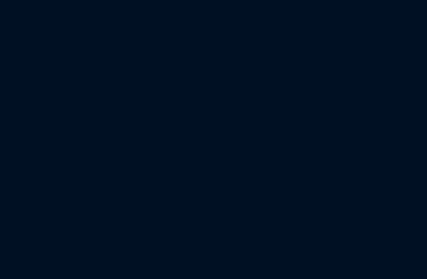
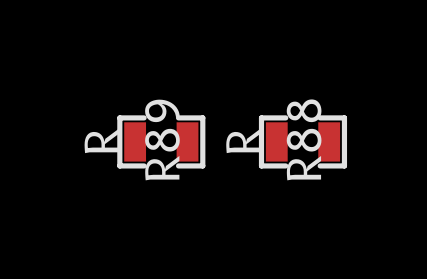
R89: none -> R (161, 141)
R88: none -> R (302, 141)

